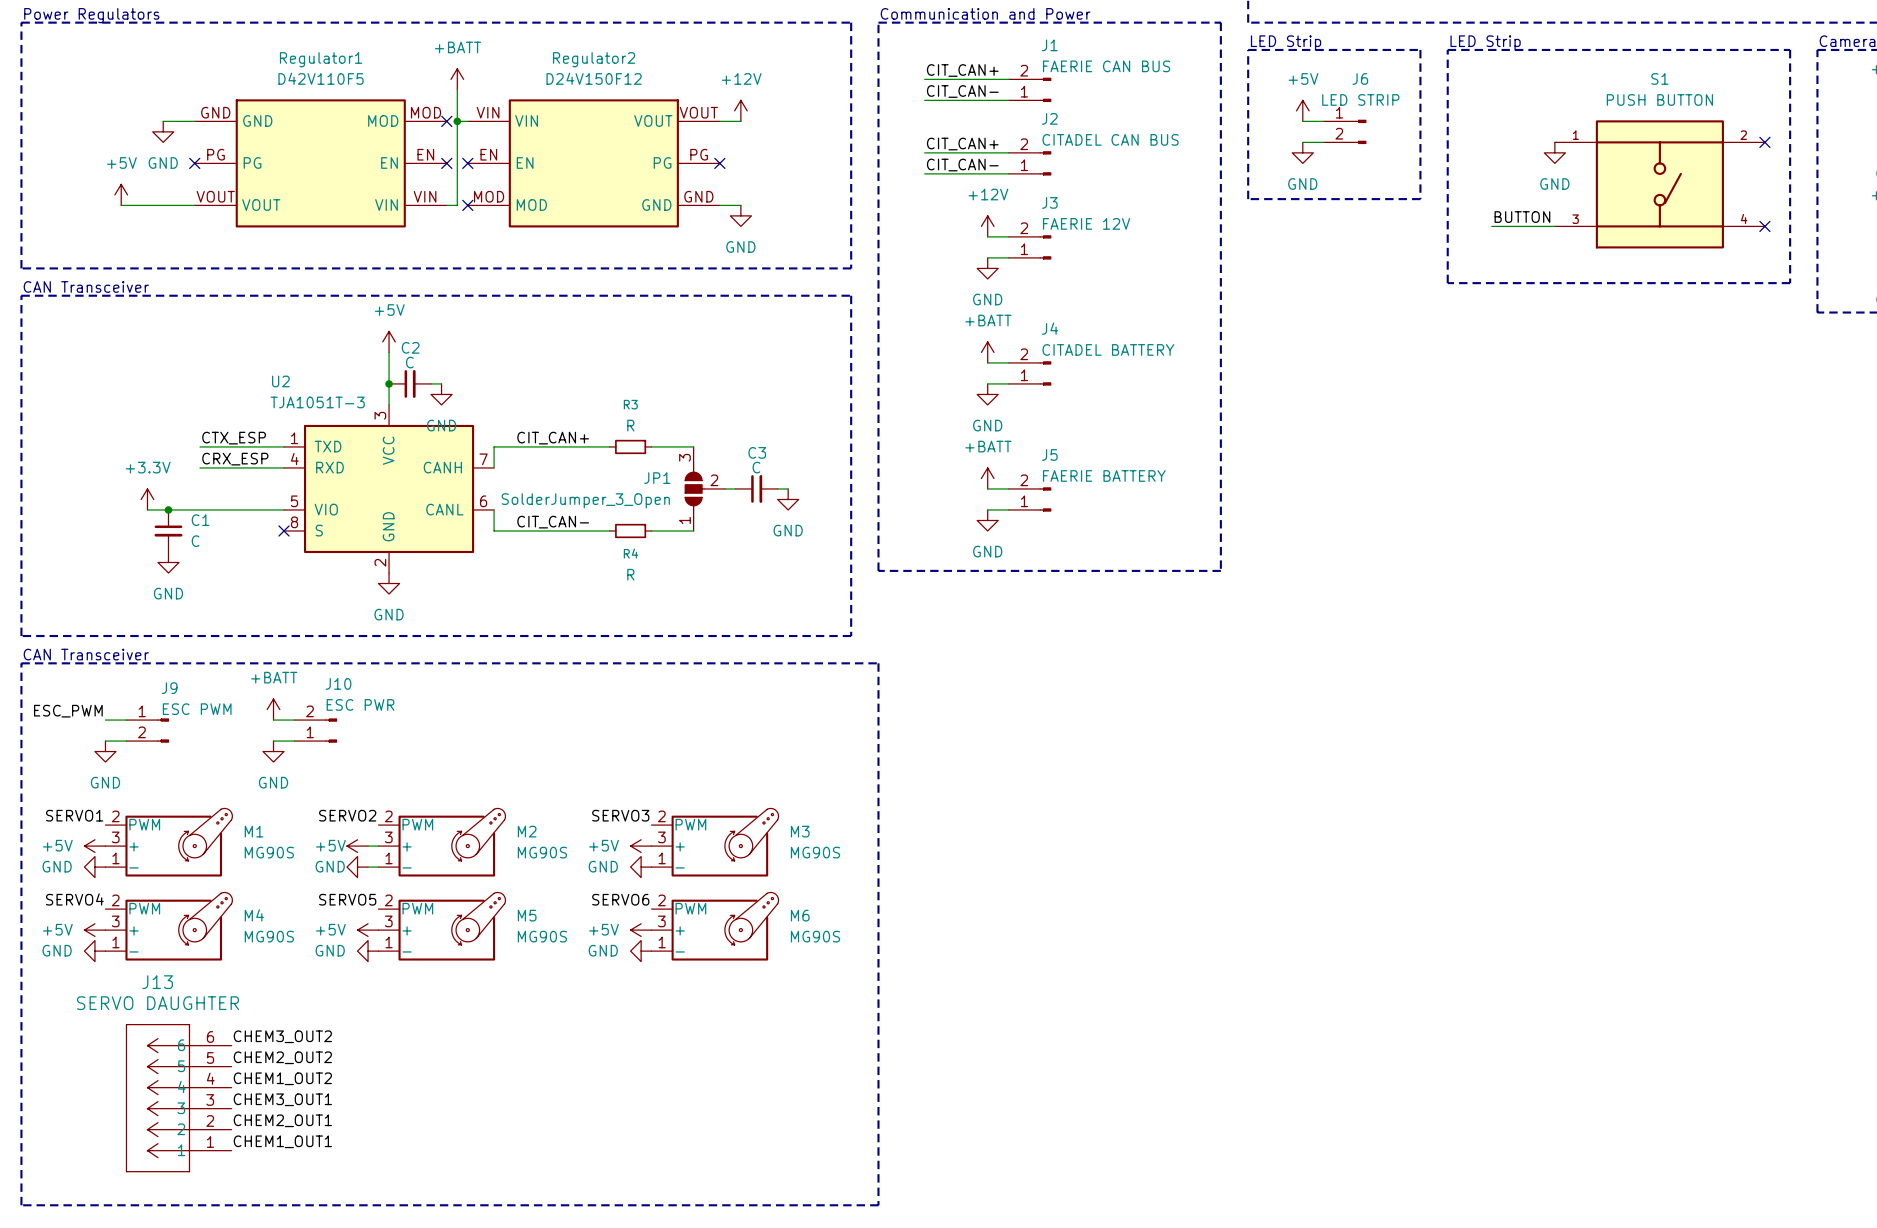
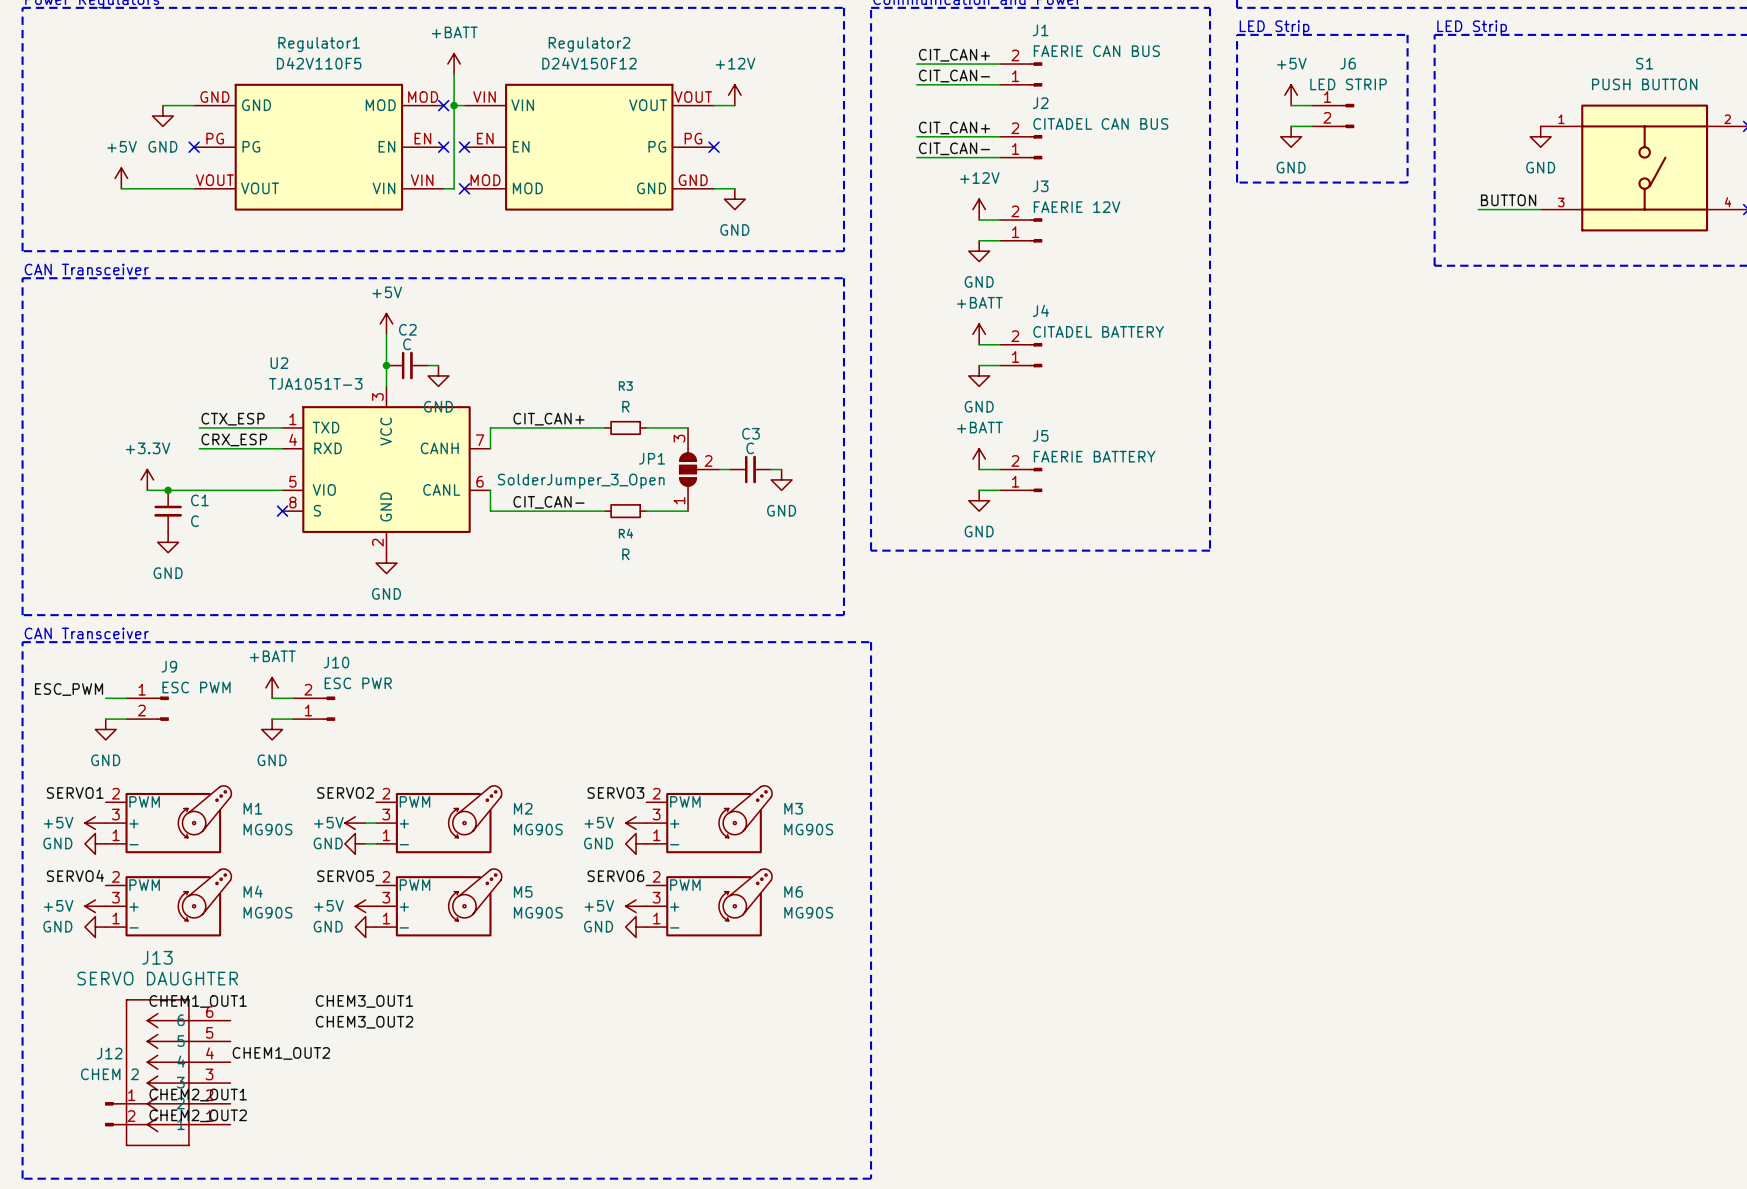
label position: CHEM3_OUT2 (282, 1036) -> CHEM3_OUT2 (364, 1022)
label position: CHEM2_OUT2 (282, 1057) -> CHEM2_OUT2 (198, 1115)
label position: CHEM3_OUT1 (282, 1099) -> CHEM3_OUT1 (364, 1001)
label position: CHEM2_OUT1 (282, 1120) -> CHEM2_OUT1 (198, 1095)
J12: none -> CHEM 2 (126, 1114)
label position: CHEM1_OUT1 (282, 1141) -> CHEM1_OUT1 (198, 1001)

